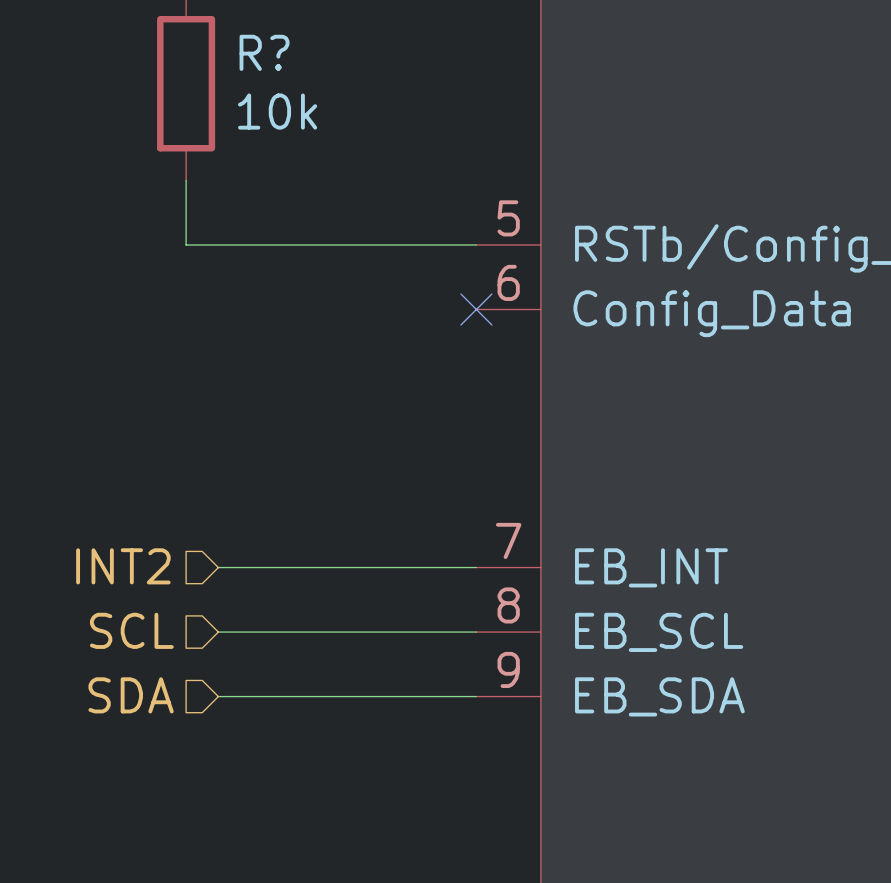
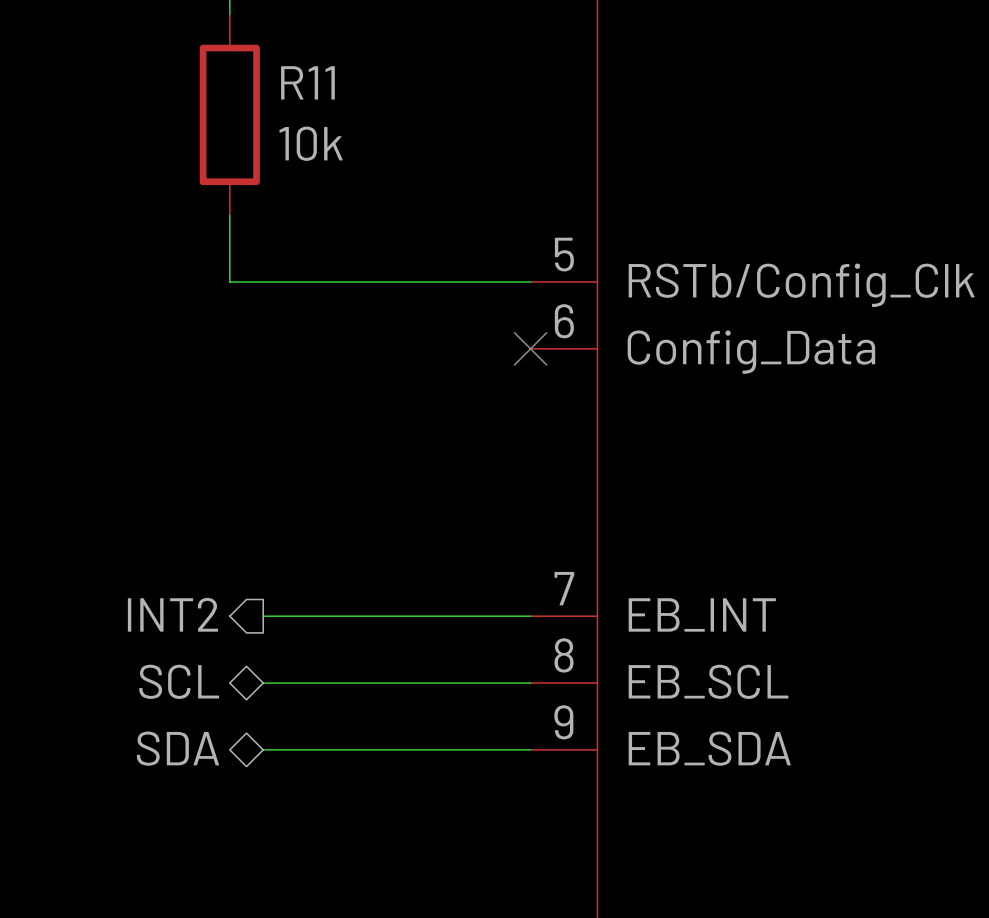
R? name: R? (264, 52) -> R11 (307, 82)
hierarchical label shape: input (123, 566) -> output (172, 614)
hierarchical label shape: input (131, 630) -> bidirectional (179, 681)
hierarchical label shape: input (131, 695) -> bidirectional (178, 748)

